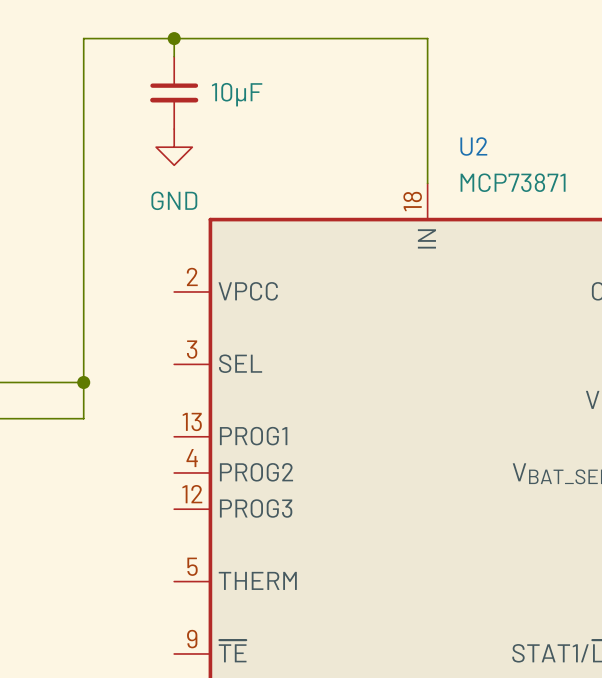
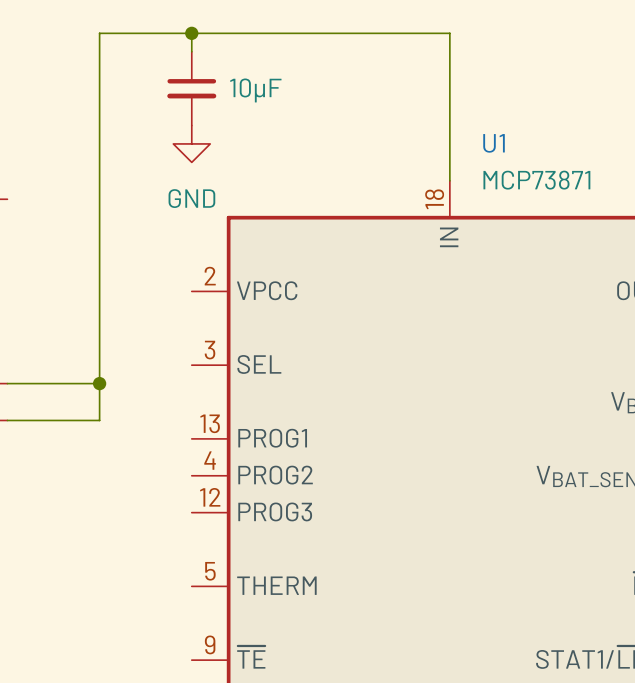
U2 name: U2 (473, 146) -> U1 (494, 143)

